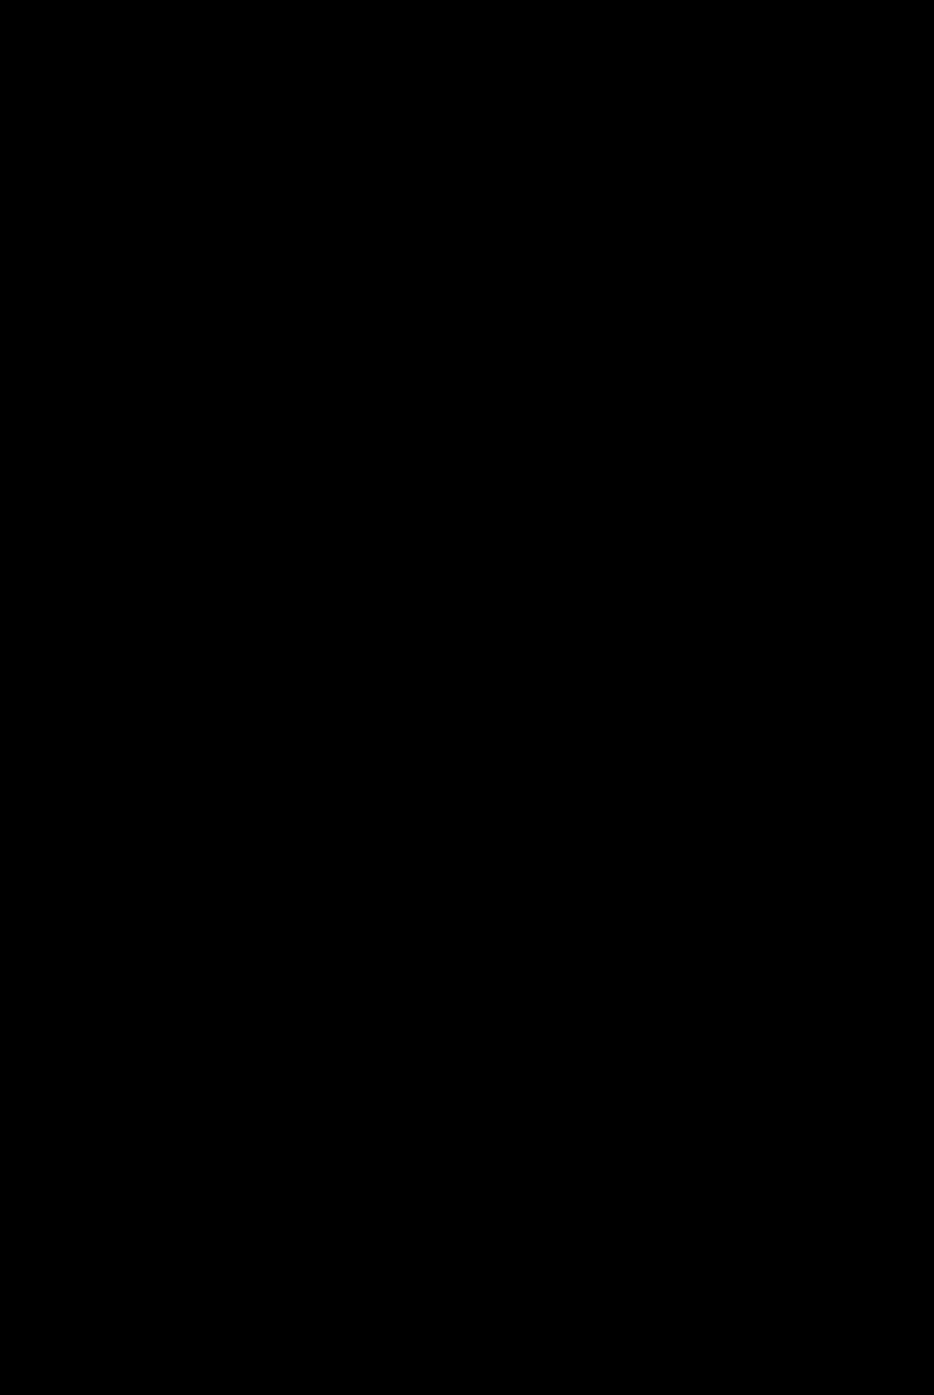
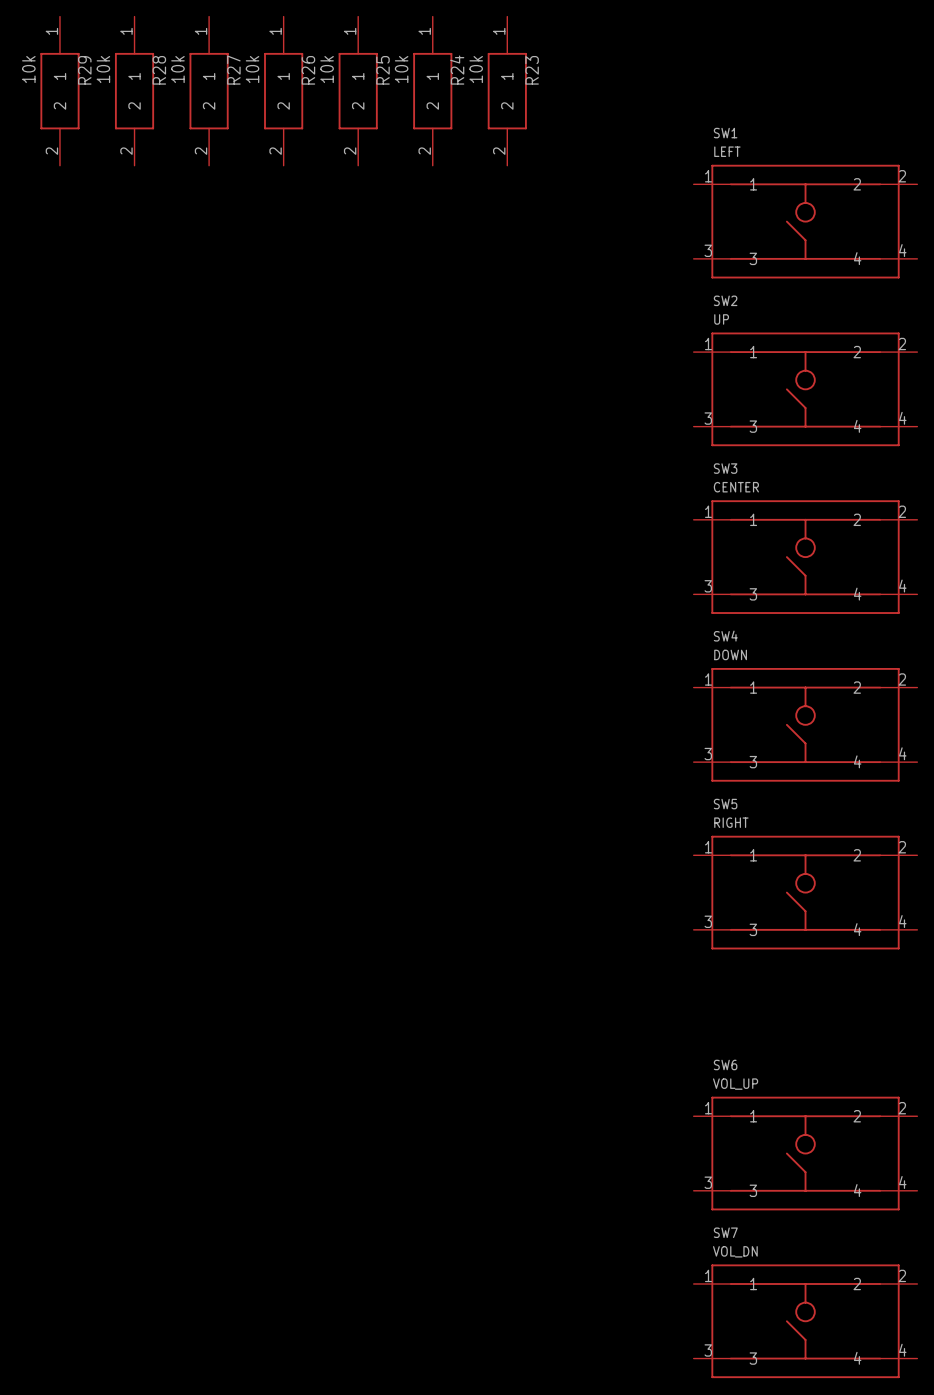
R29: none -> 10k (59, 91)
R28: none -> 10k (134, 91)
R27: none -> 10k (209, 91)
R26: none -> 10k (283, 91)
R25: none -> 10k (358, 91)
R24: none -> 10k (432, 91)
R23: none -> 10k (507, 91)
SW1: none -> LEFT (805, 221)
SW2: none -> UP (805, 389)
SW3: none -> CENTER (805, 557)
SW4: none -> DOWN (805, 724)
SW5: none -> RIGHT (805, 892)
SW6: none -> VOL_UP (805, 1153)
SW7: none -> VOL_DN (805, 1321)

